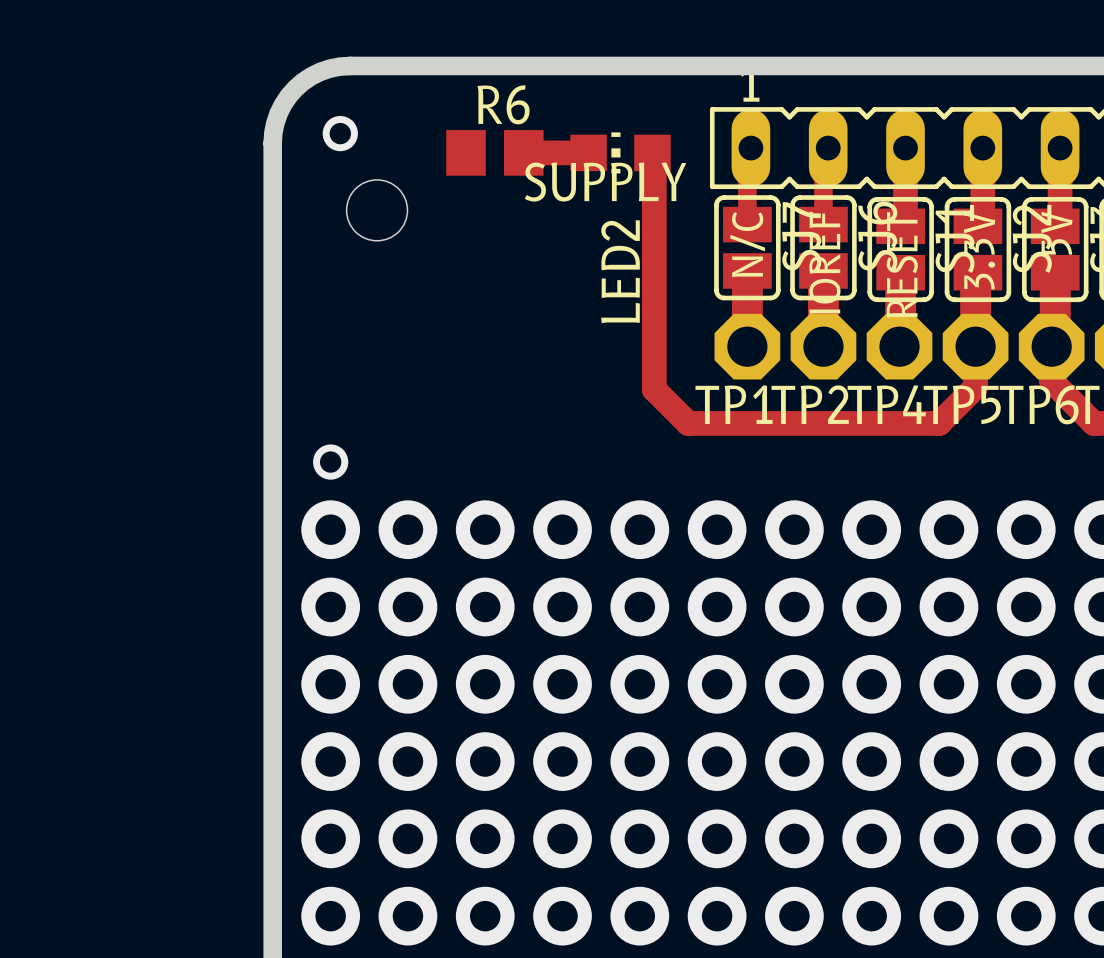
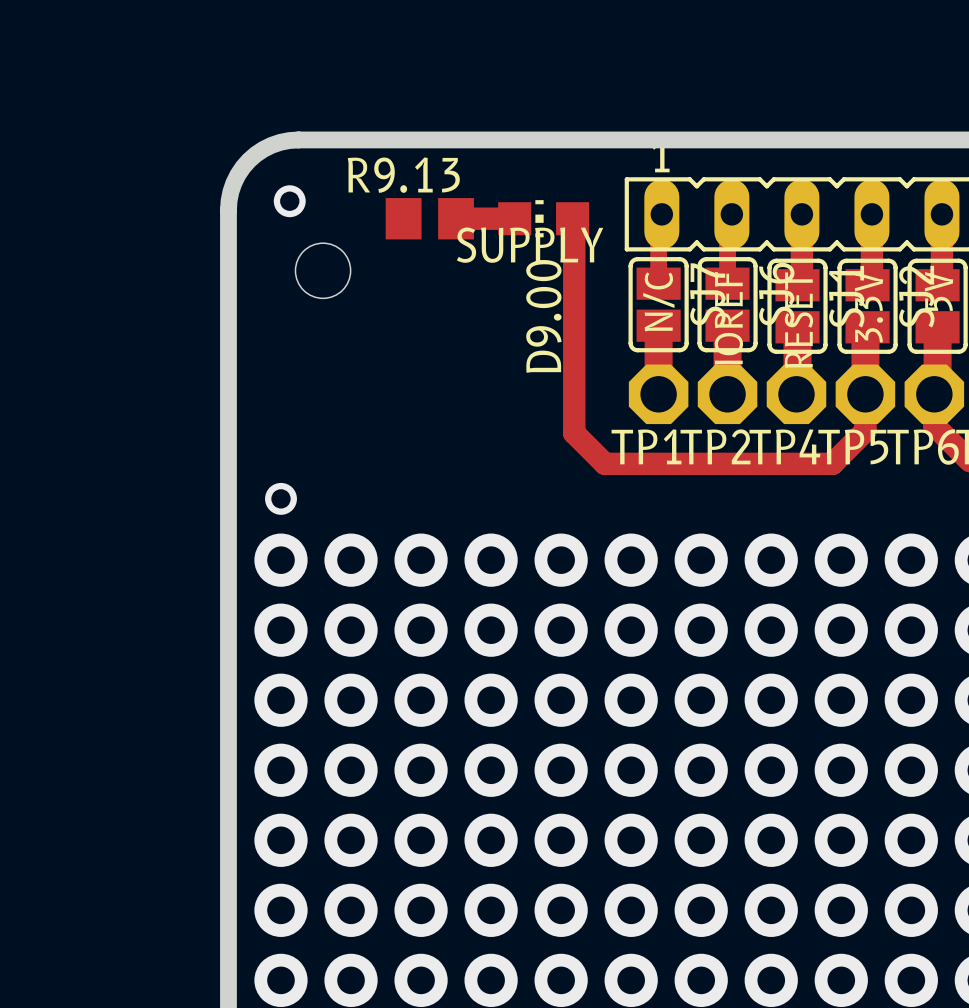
R6 name: R6 (503, 104) -> R9.13 (403, 175)
LED2 name: LED2 (620, 271) -> D9.00 (543, 316)

